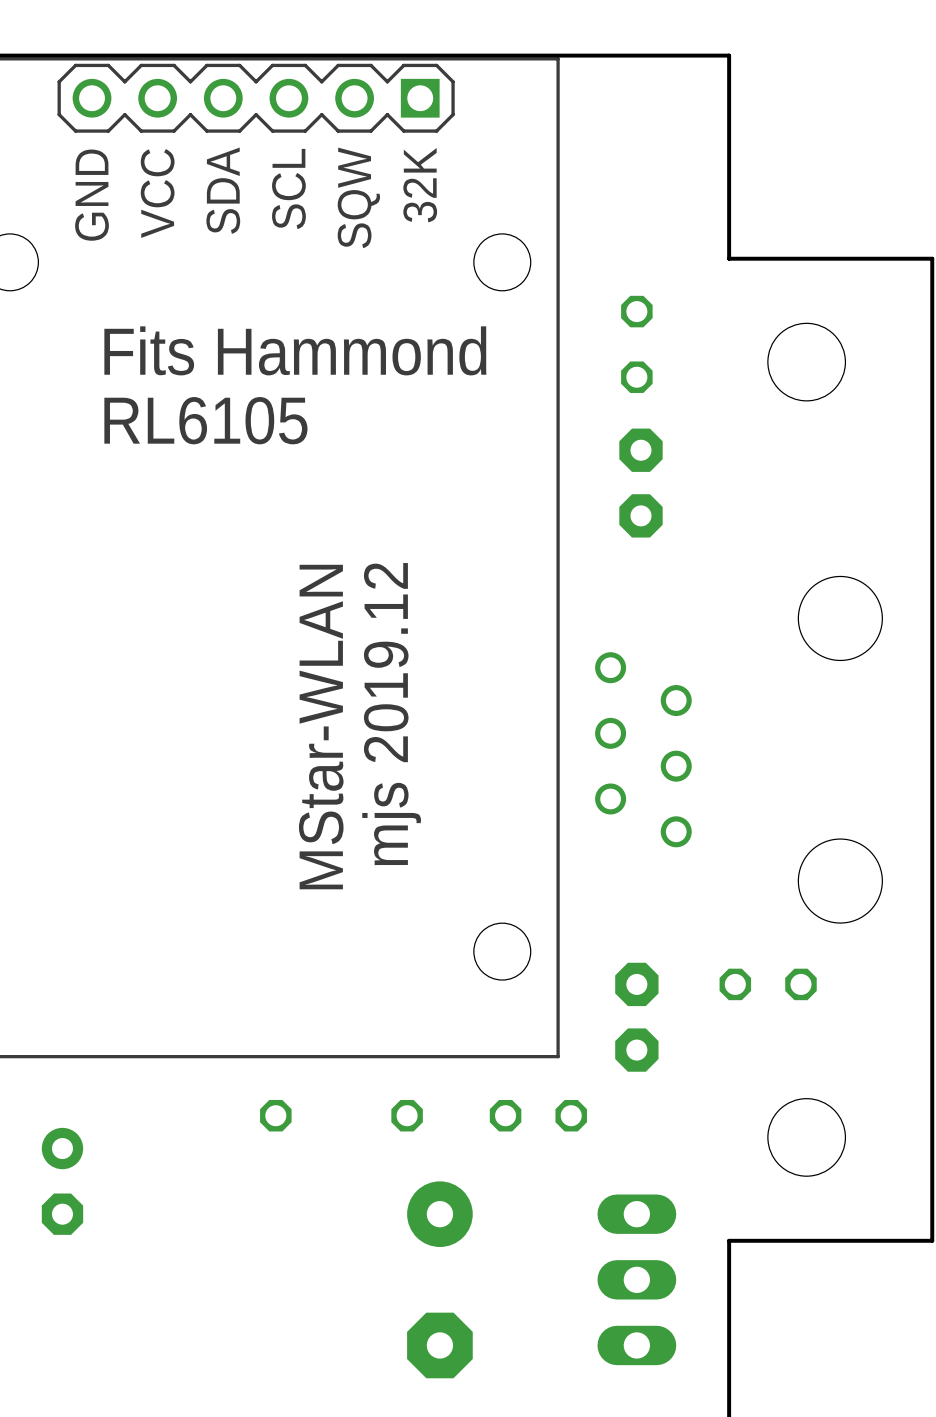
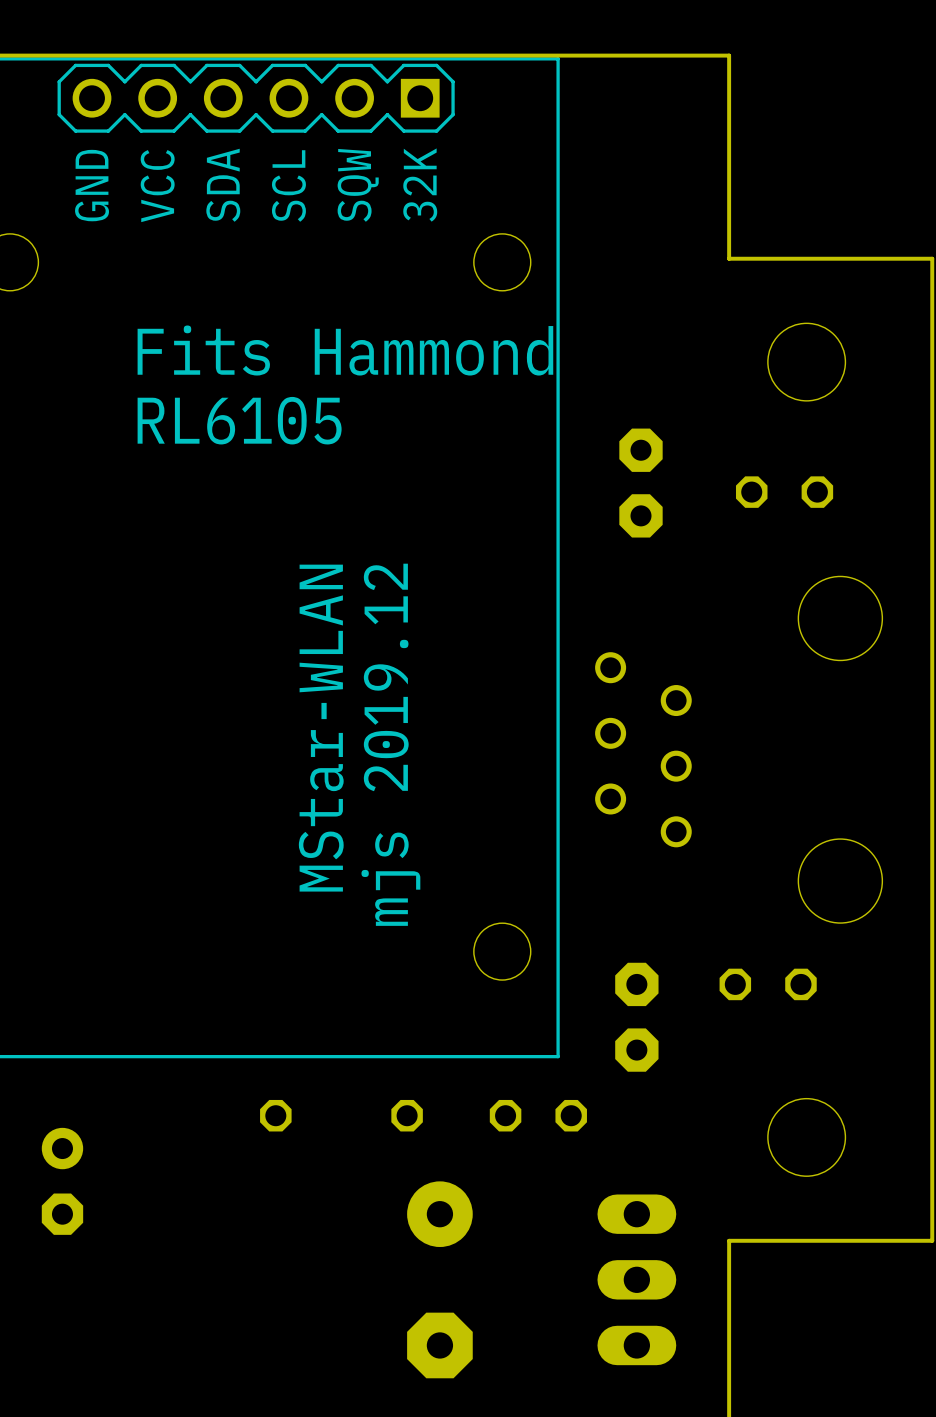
part rotation: 0° (636, 344) -> 90° clockwise (784, 492)
part position: (636, 344) -> (784, 492)
text position: Fits Hammond (295, 350) -> Fits Hammond (345, 350)
text position: RL6105 (205, 420) -> RL6105 (239, 420)

